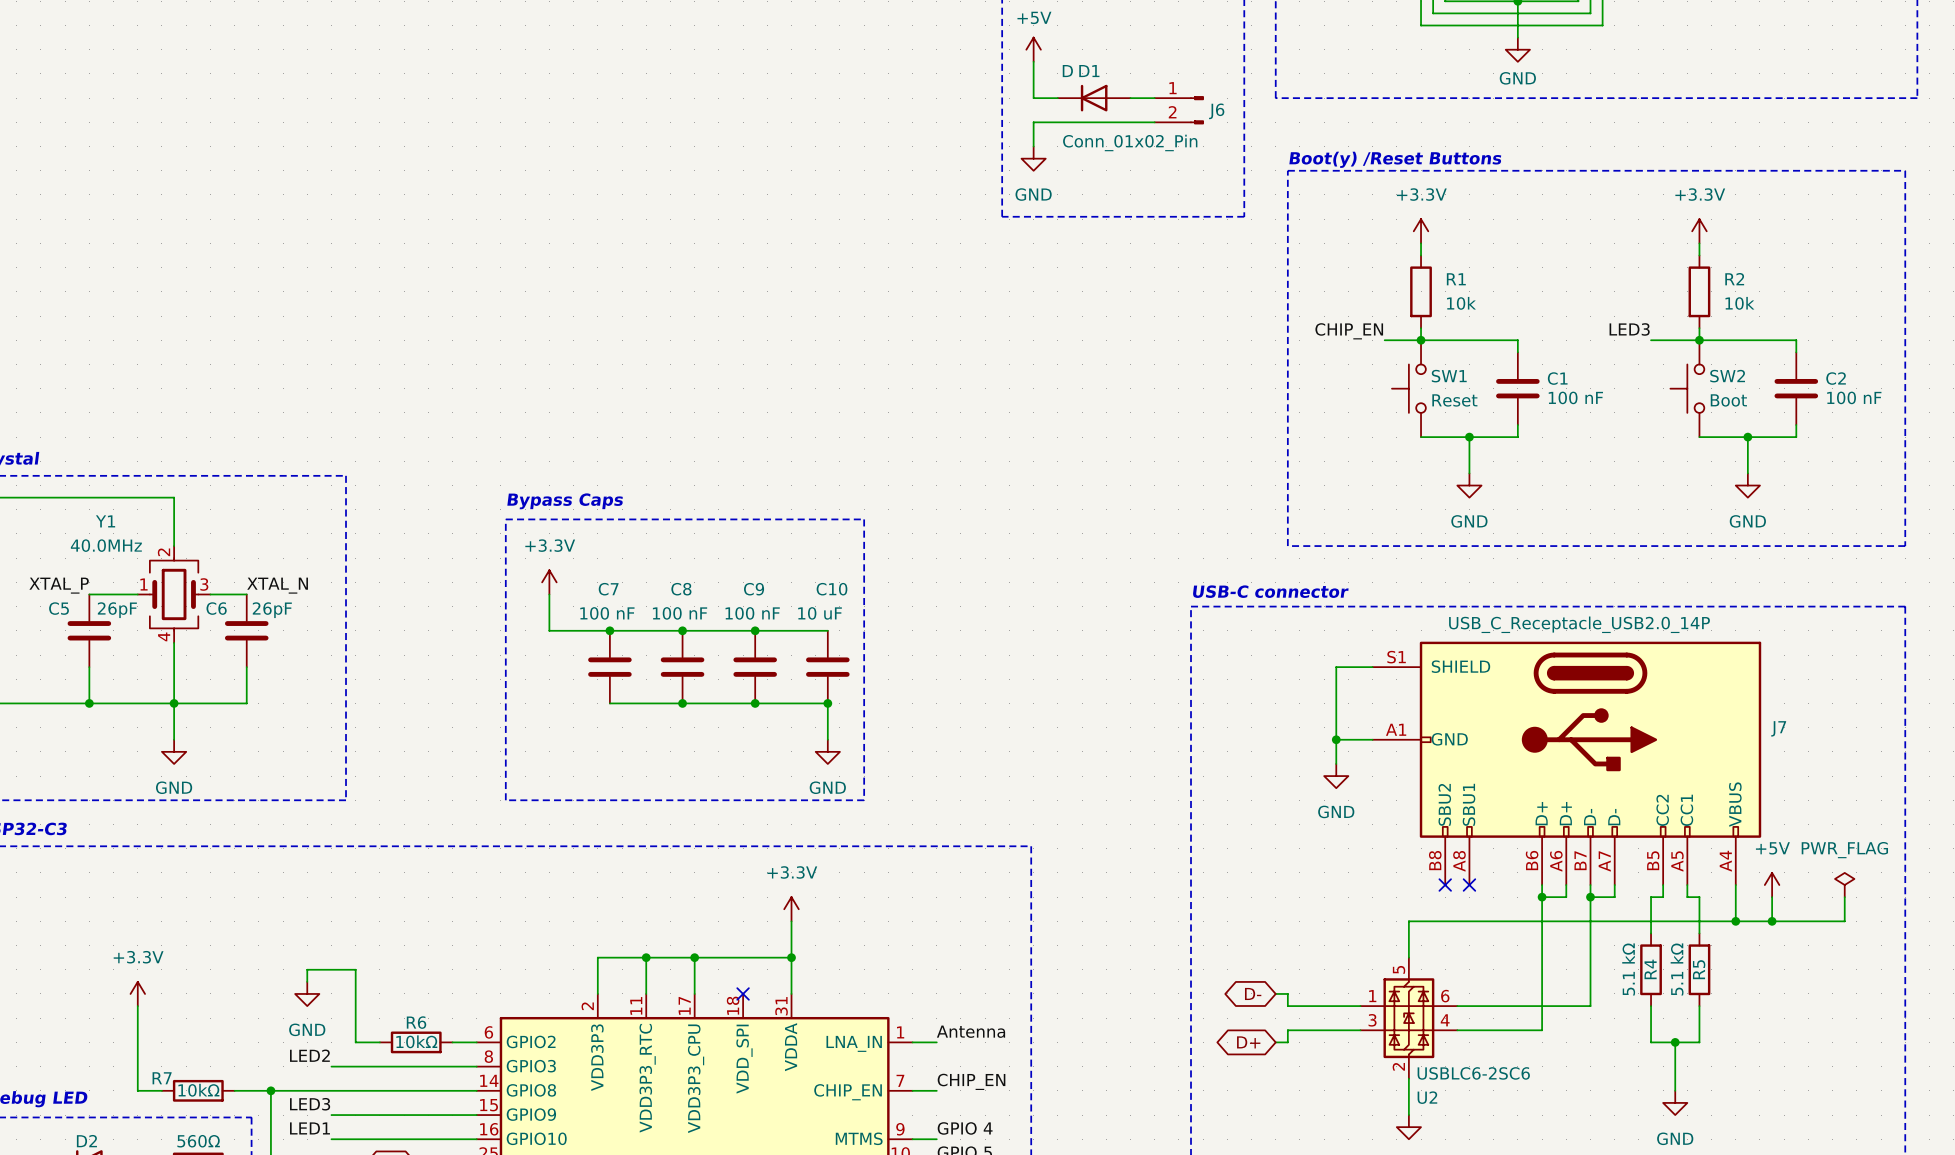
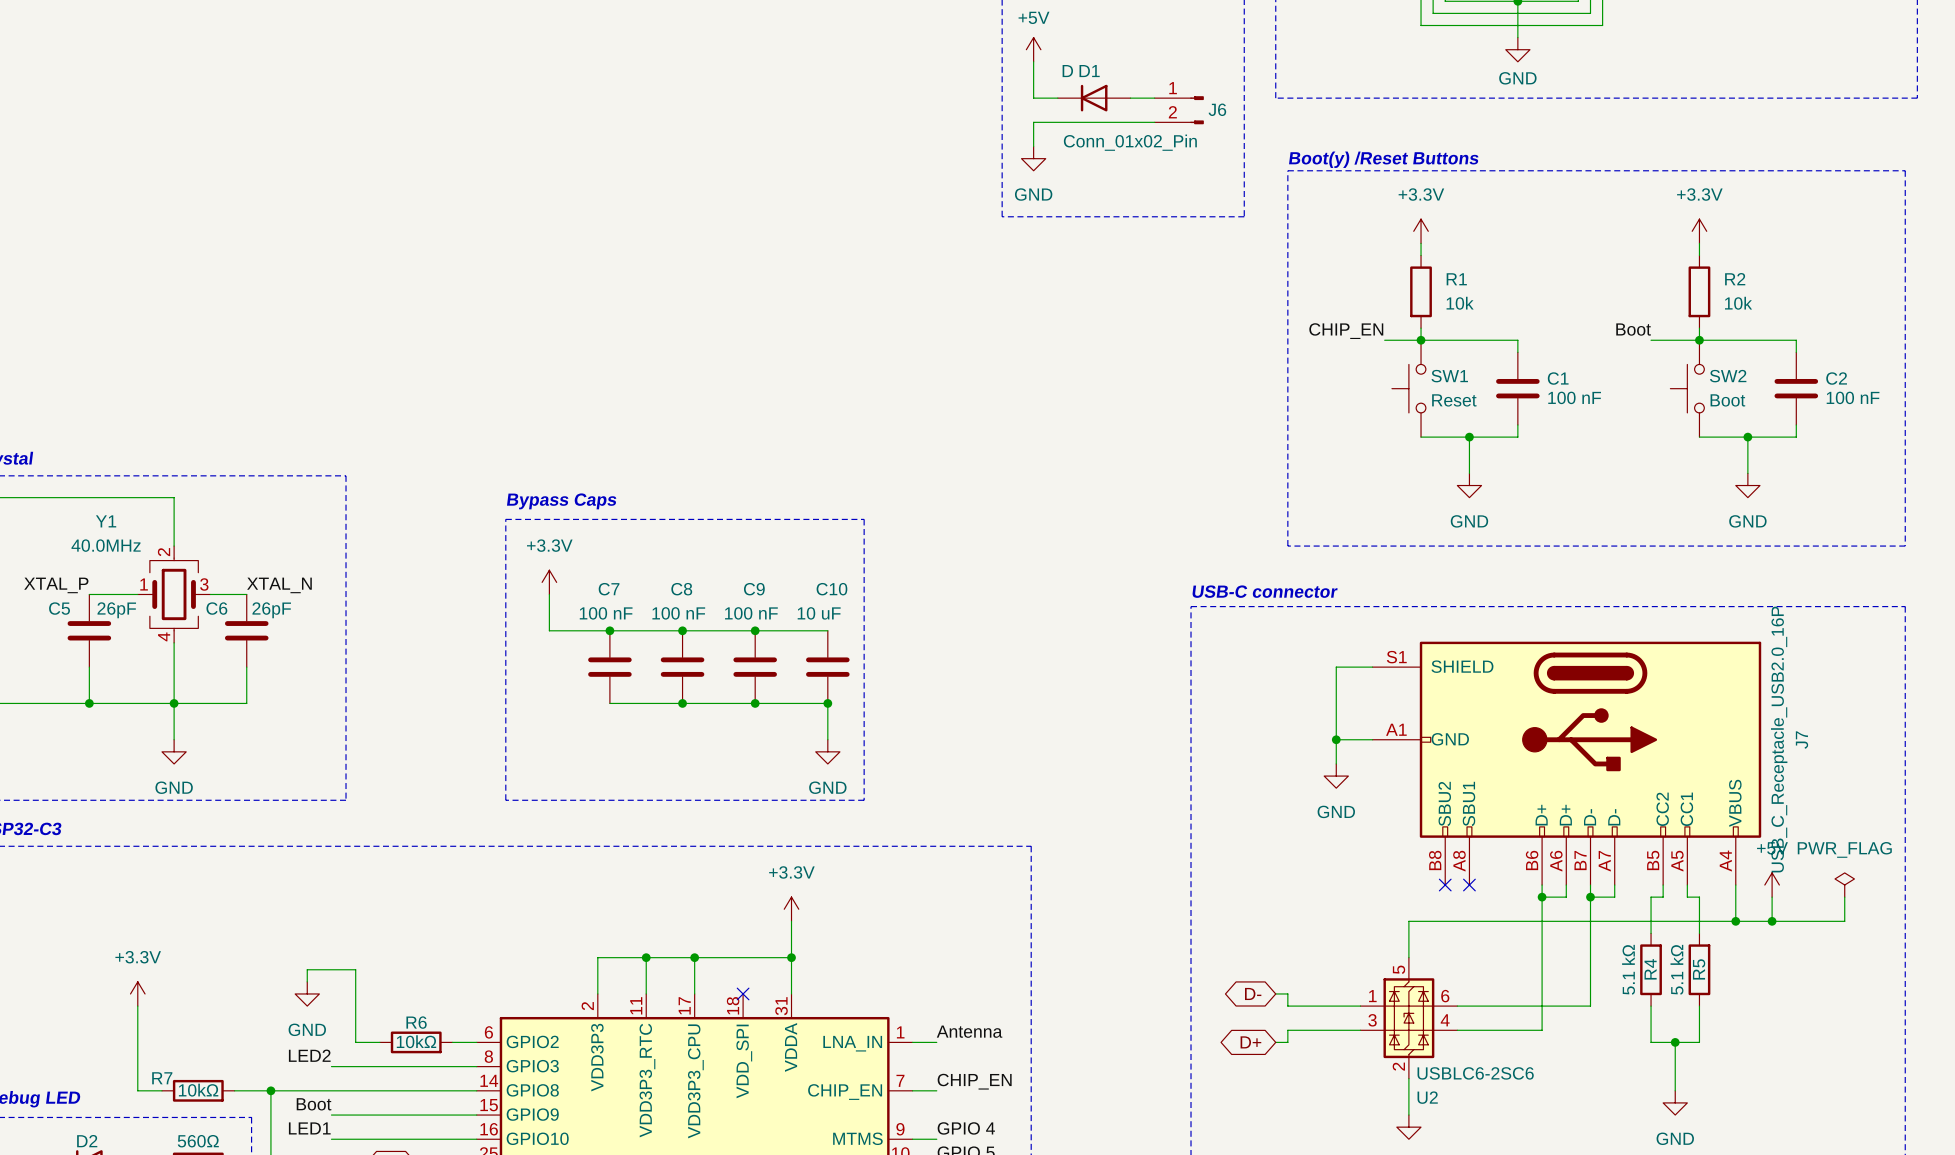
label: LED3 (1629, 329) -> Boot (1633, 329)
J7 value: USB_C_Receptacle_USB2.0_14P (1579, 624) -> USB_C_Receptacle_USB2.0_16P (1779, 739)
J7 name rotation: 0° (1778, 728) -> 90° counterclockwise (1801, 740)
label: LED3 (310, 1104) -> Boot (314, 1104)

